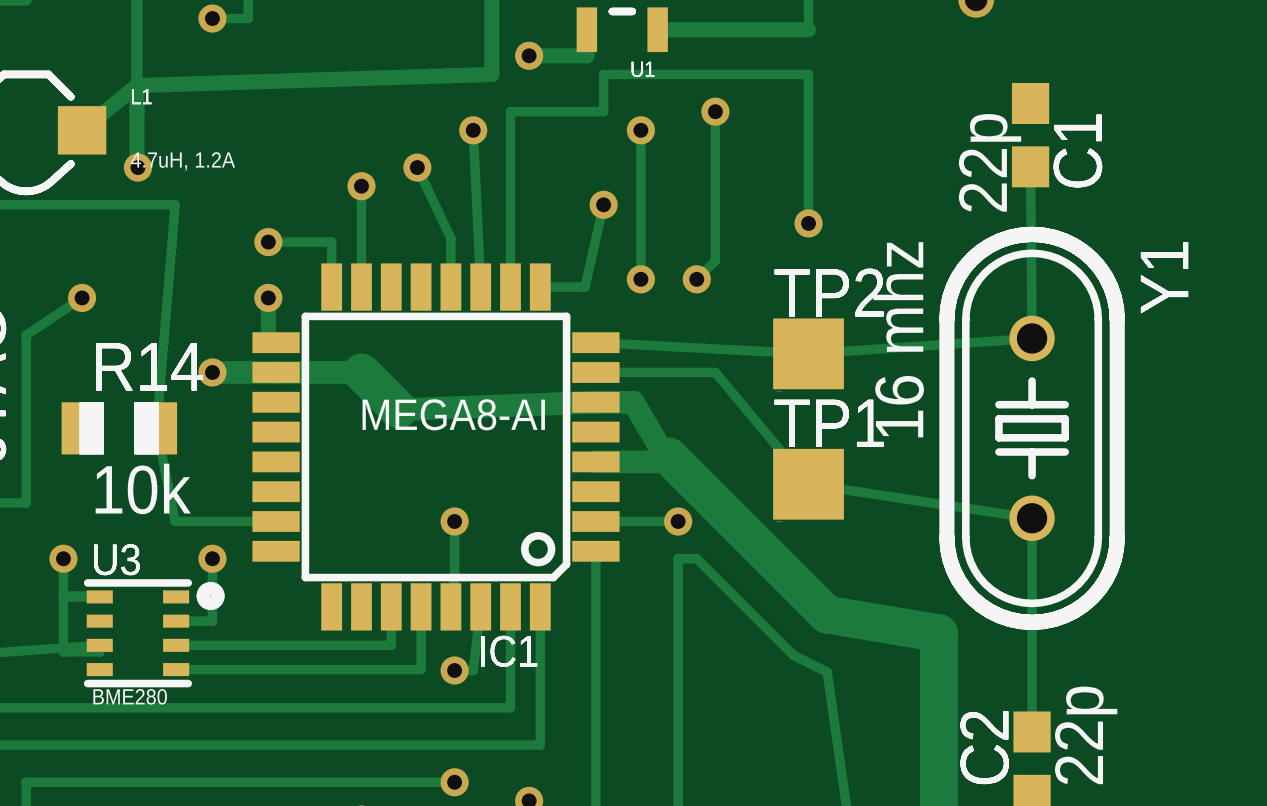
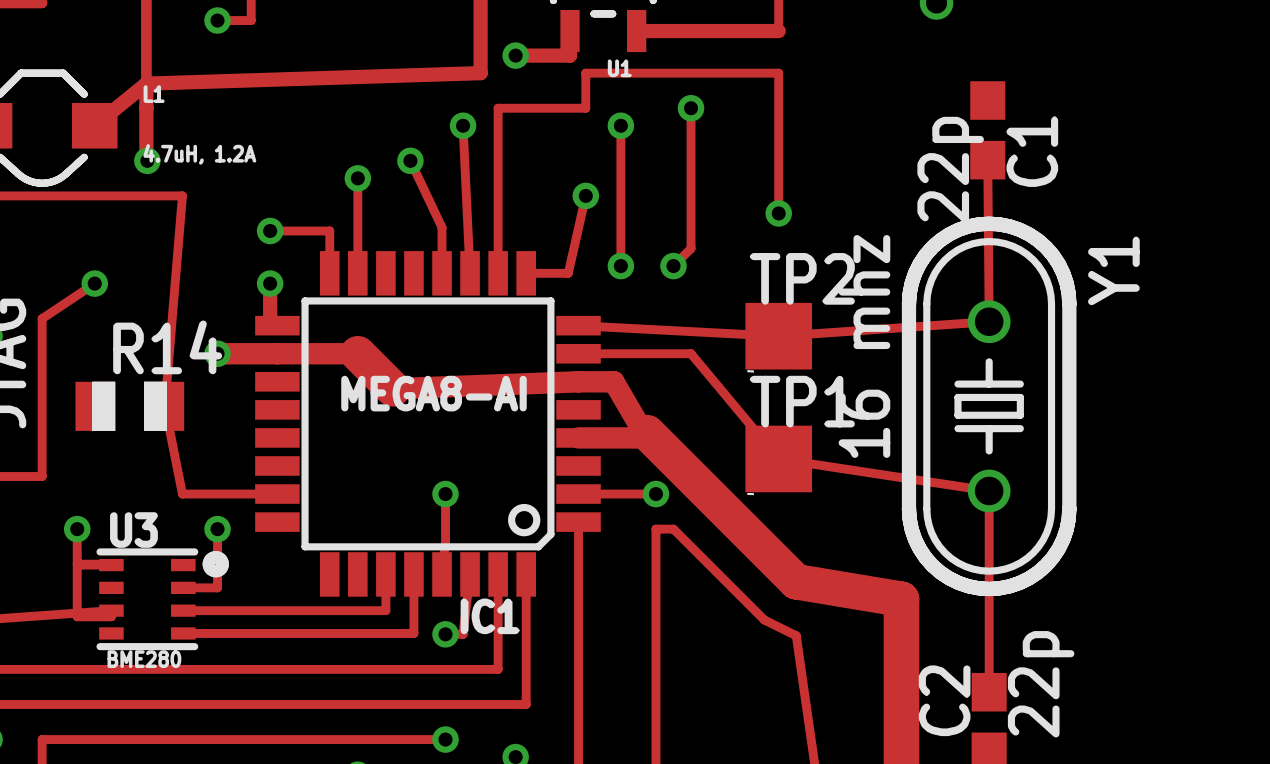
text: 10k (143, 488) -> none

